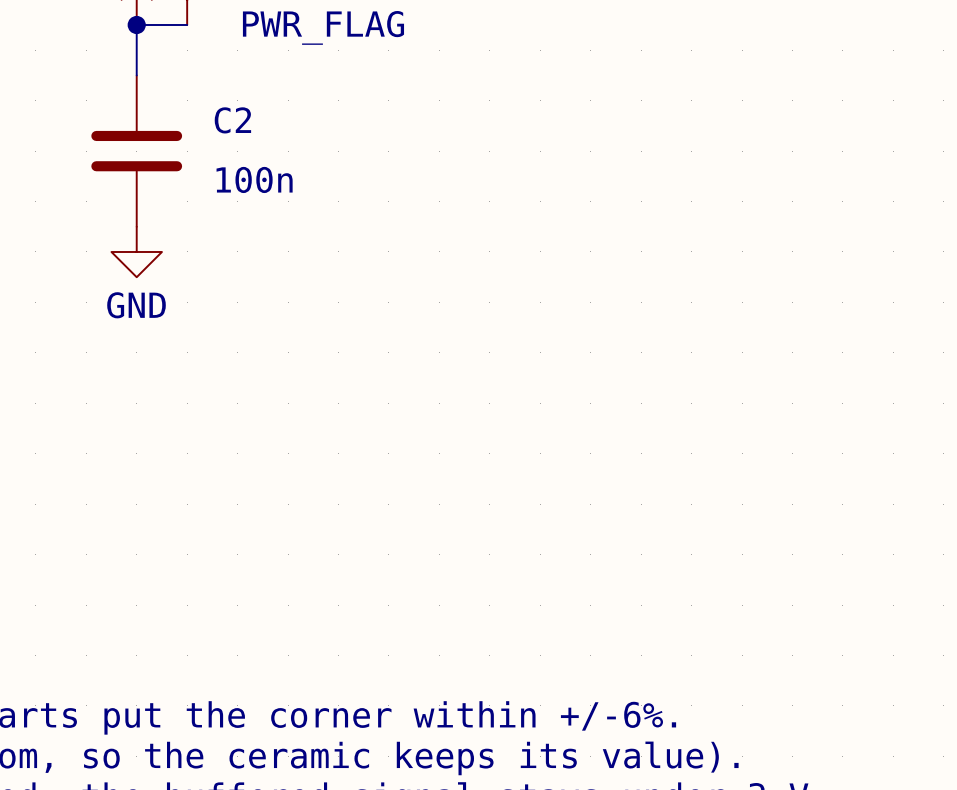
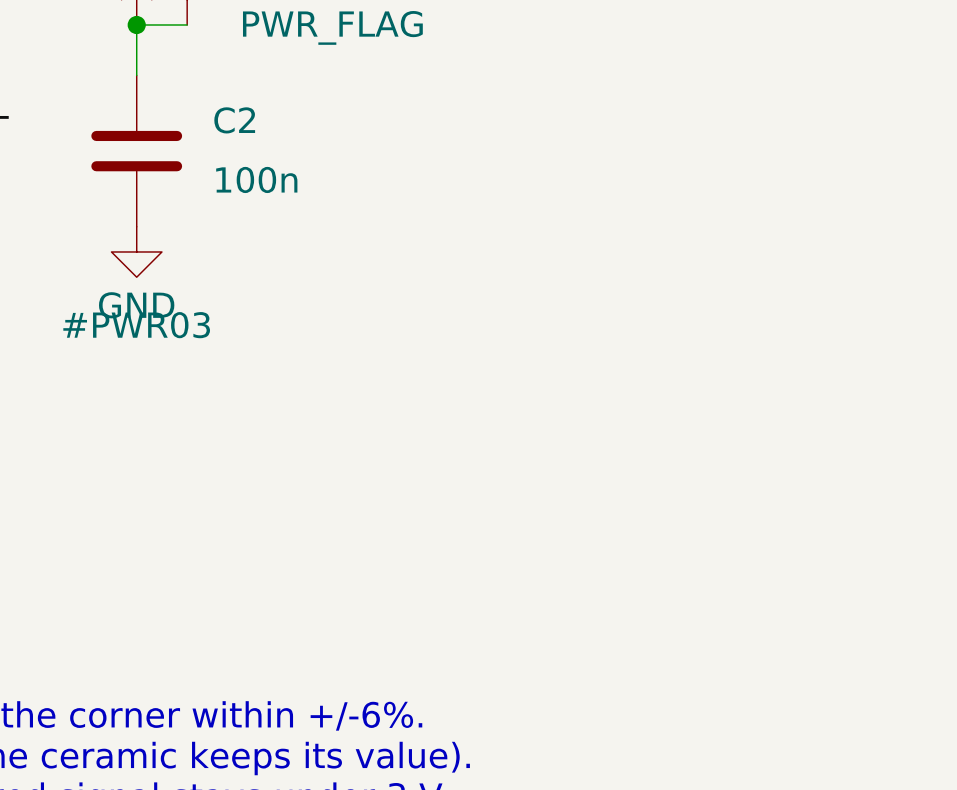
#PWR03 name: none -> #PWR03 (136, 325)

